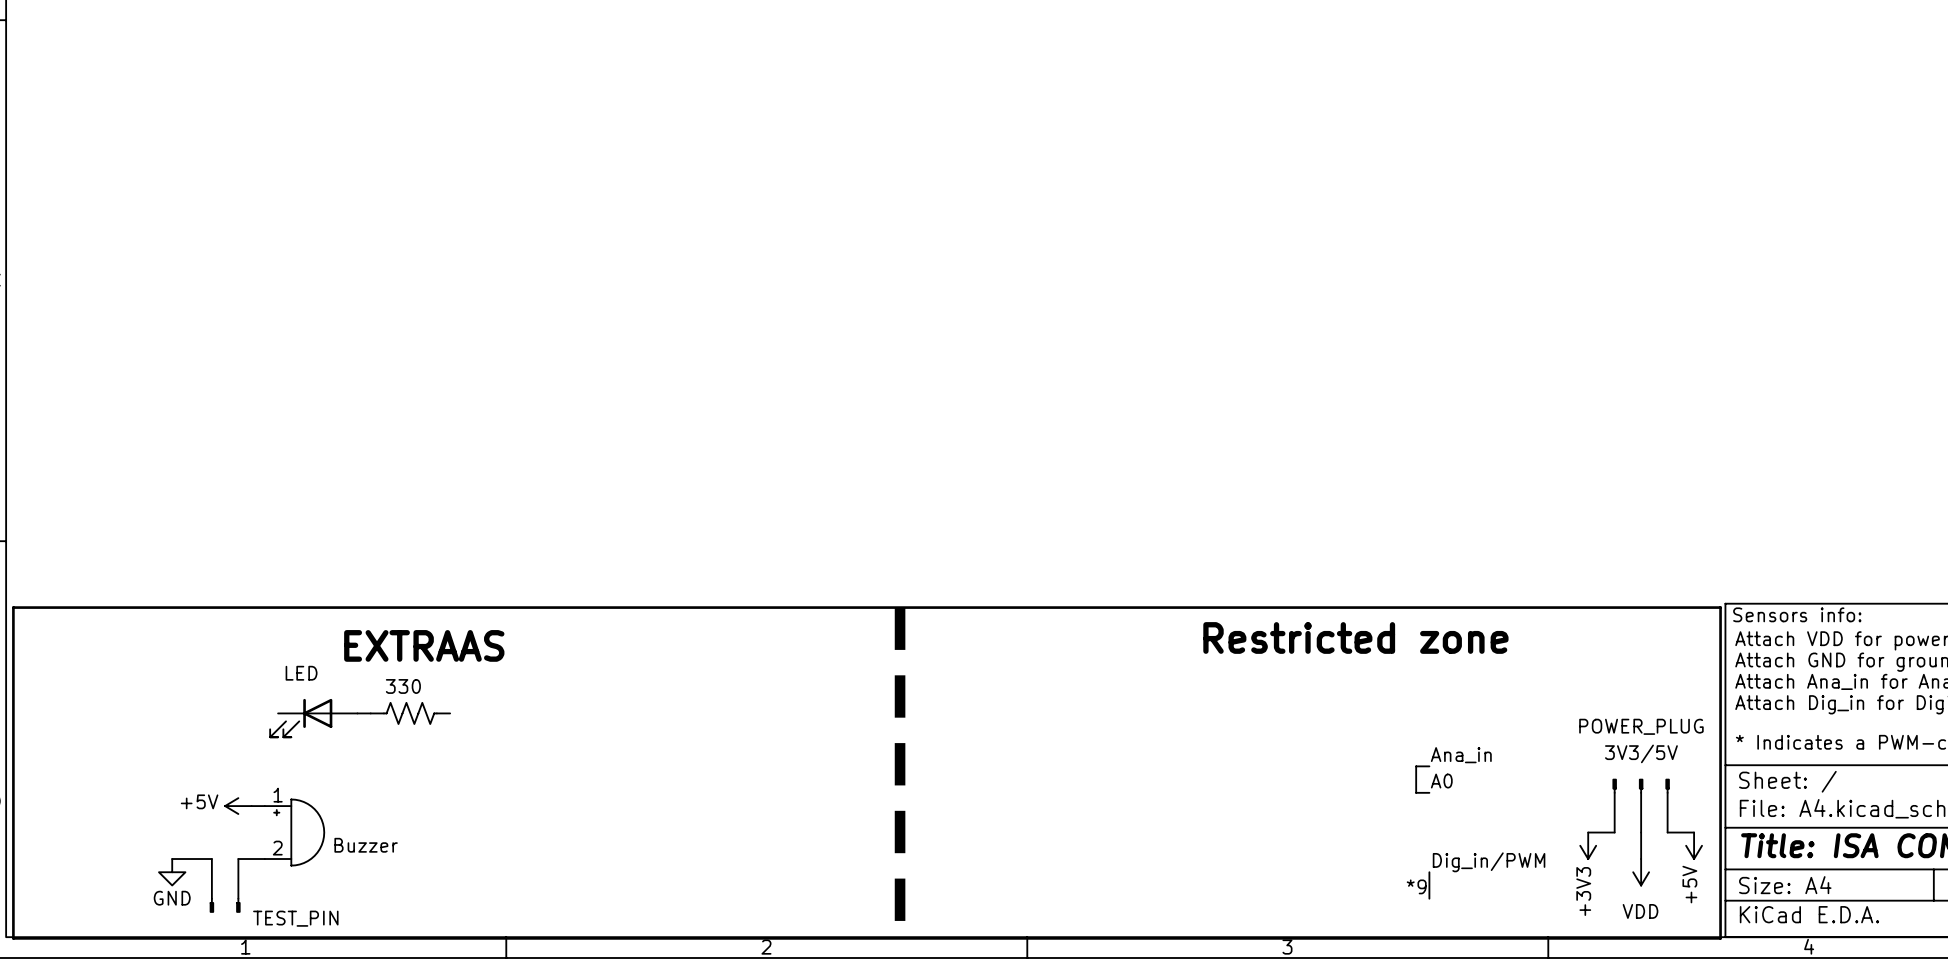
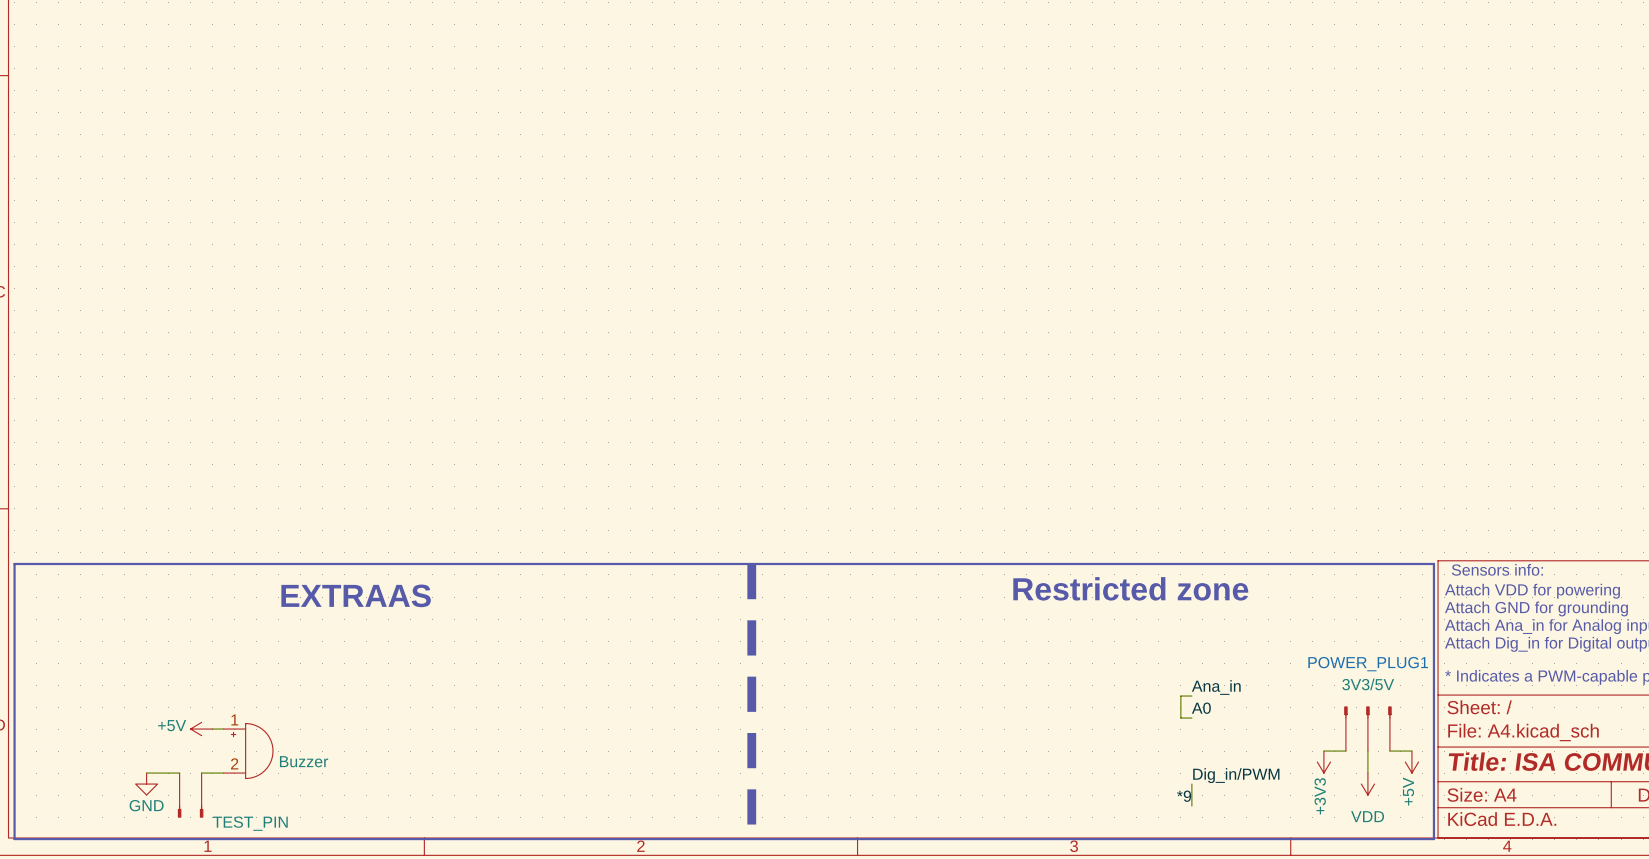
wire: (357, 713) (370, 713) -> none
part: 330 (410, 713) -> none
part: LED (313, 718) -> none
POWER_PLUG name: POWER_PLUG (1641, 726) -> POWER_PLUG1 (1368, 664)

